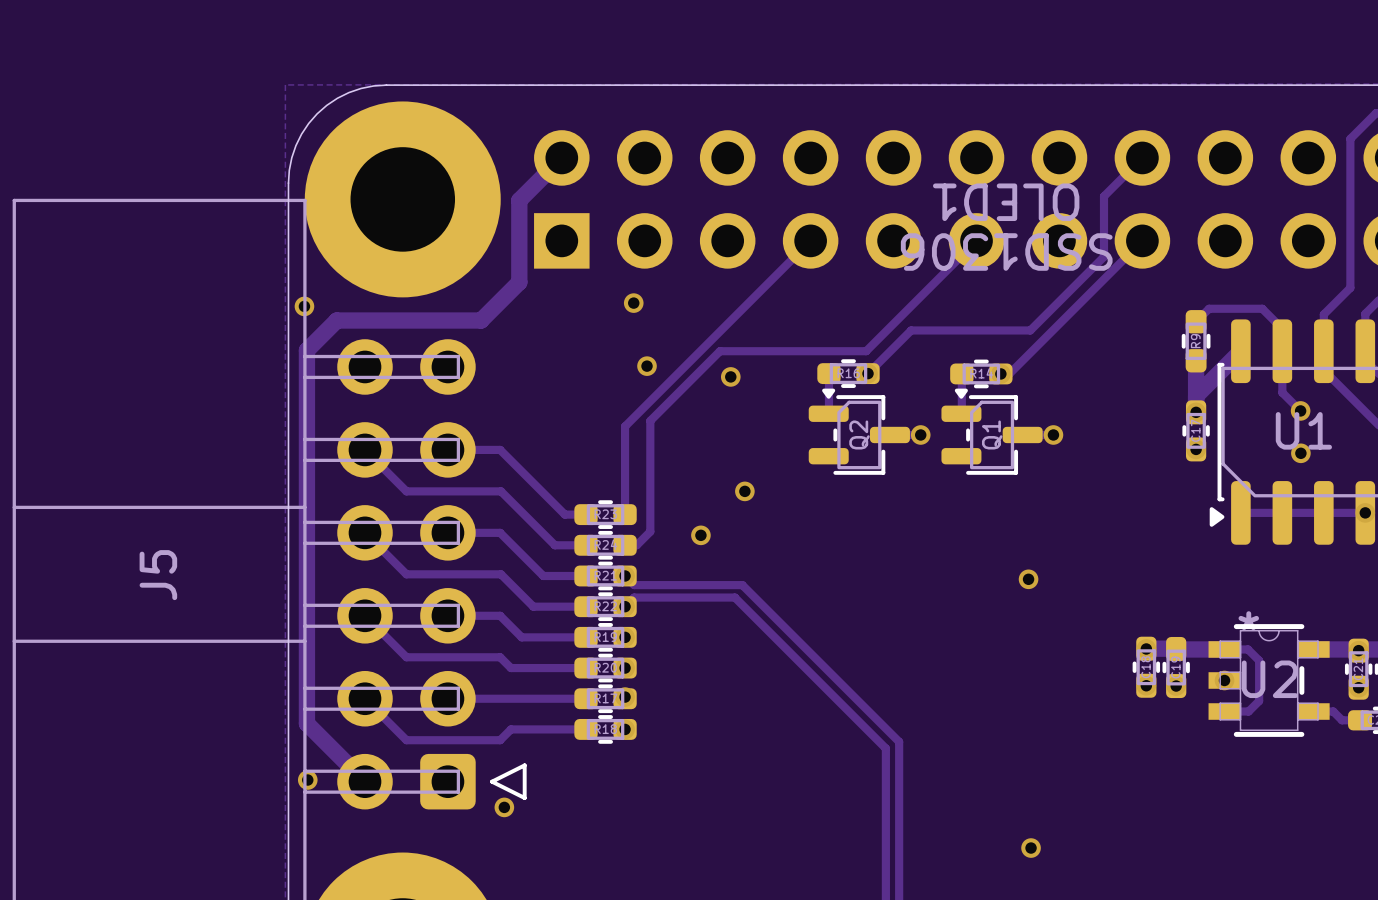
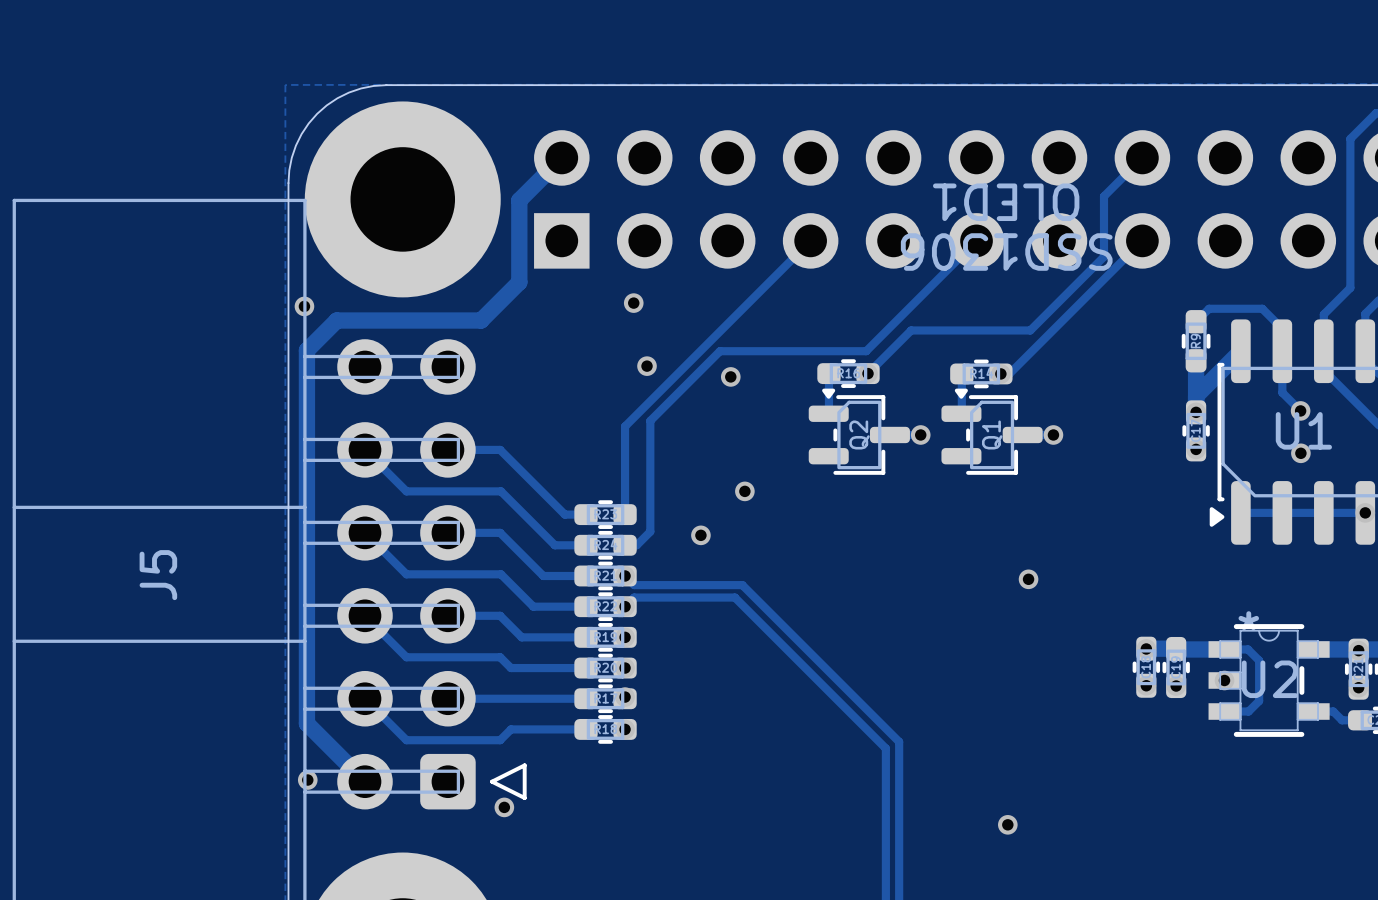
via position: (1031, 848) -> (1007, 824)

